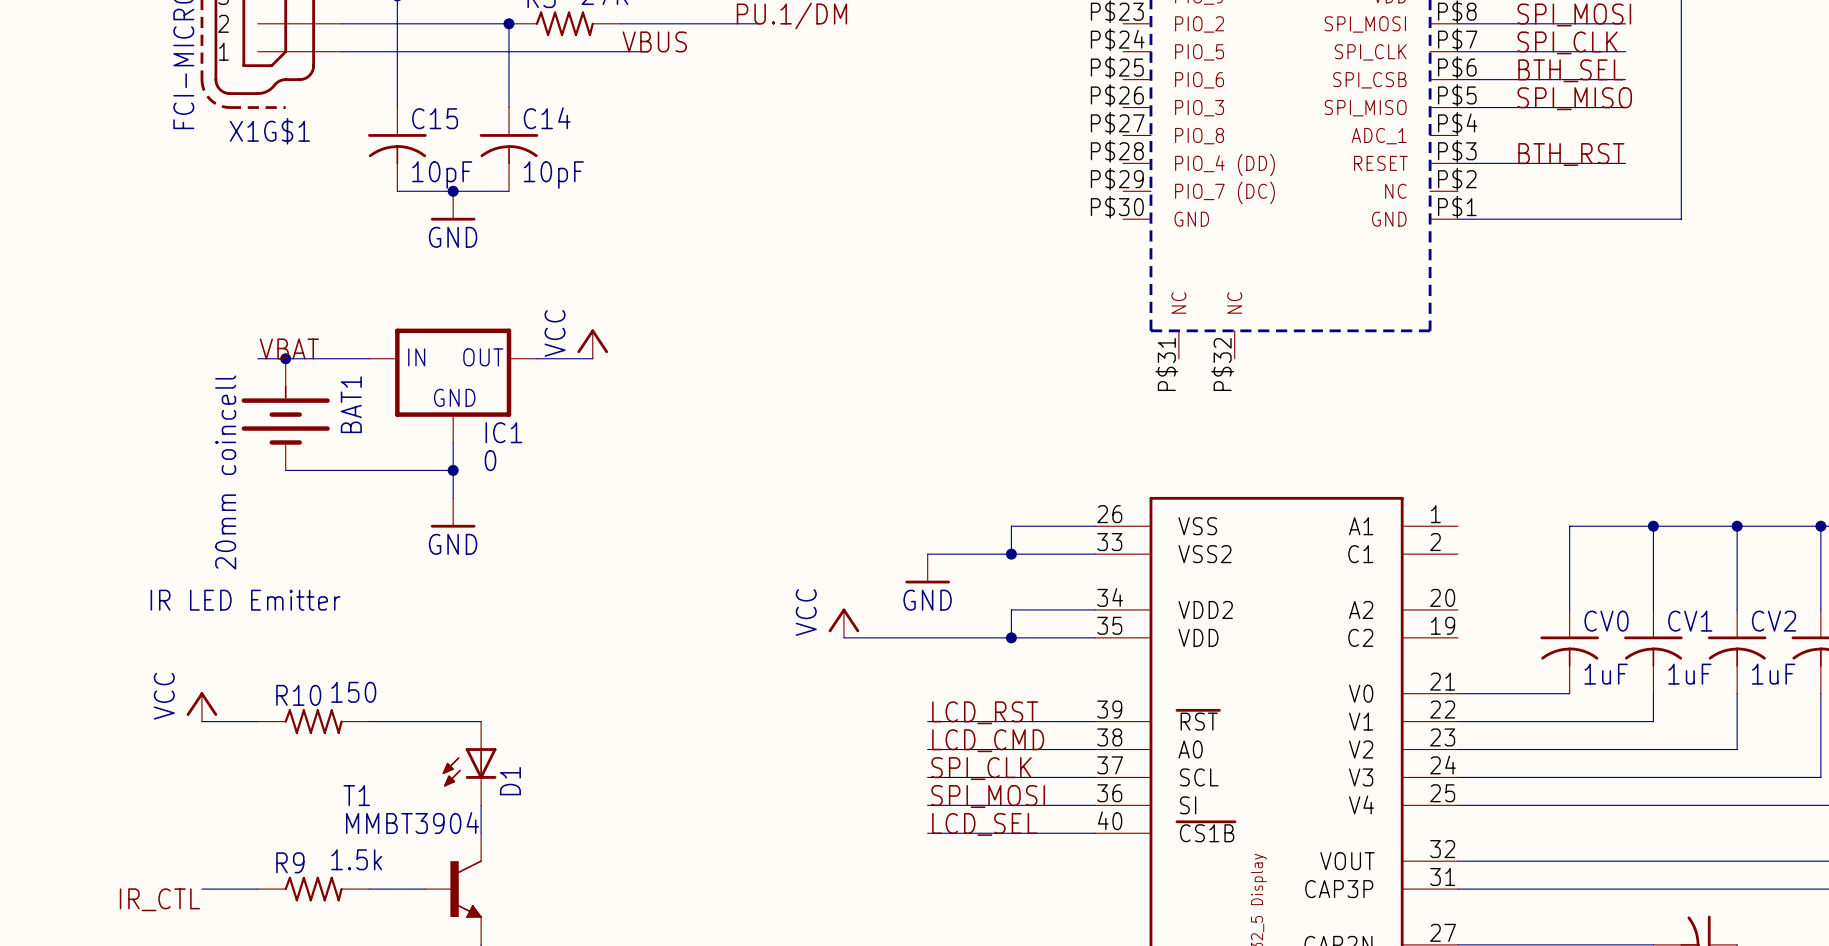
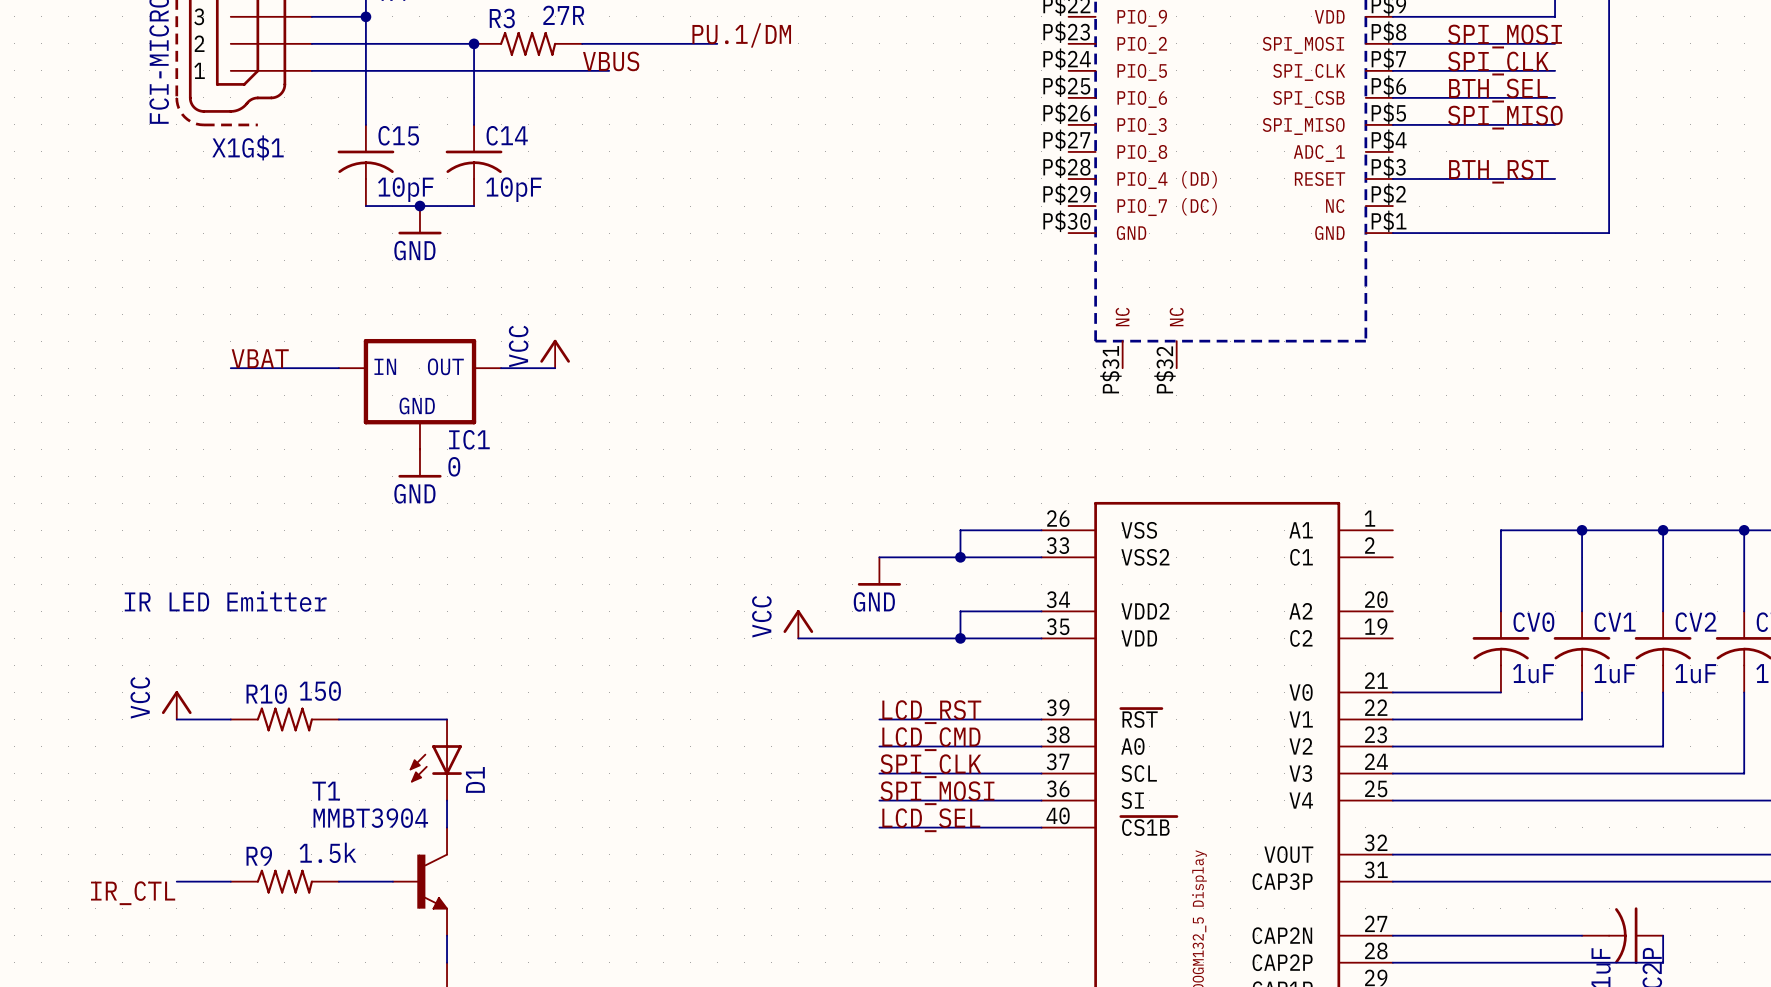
junction: (285, 358) -> none
BAT1: 20mm coincell (285, 414) -> none
wire: (285, 470) (453, 470) -> none
junction: (453, 470) -> none
power symbol position: GND (453, 512) -> GND (419, 463)

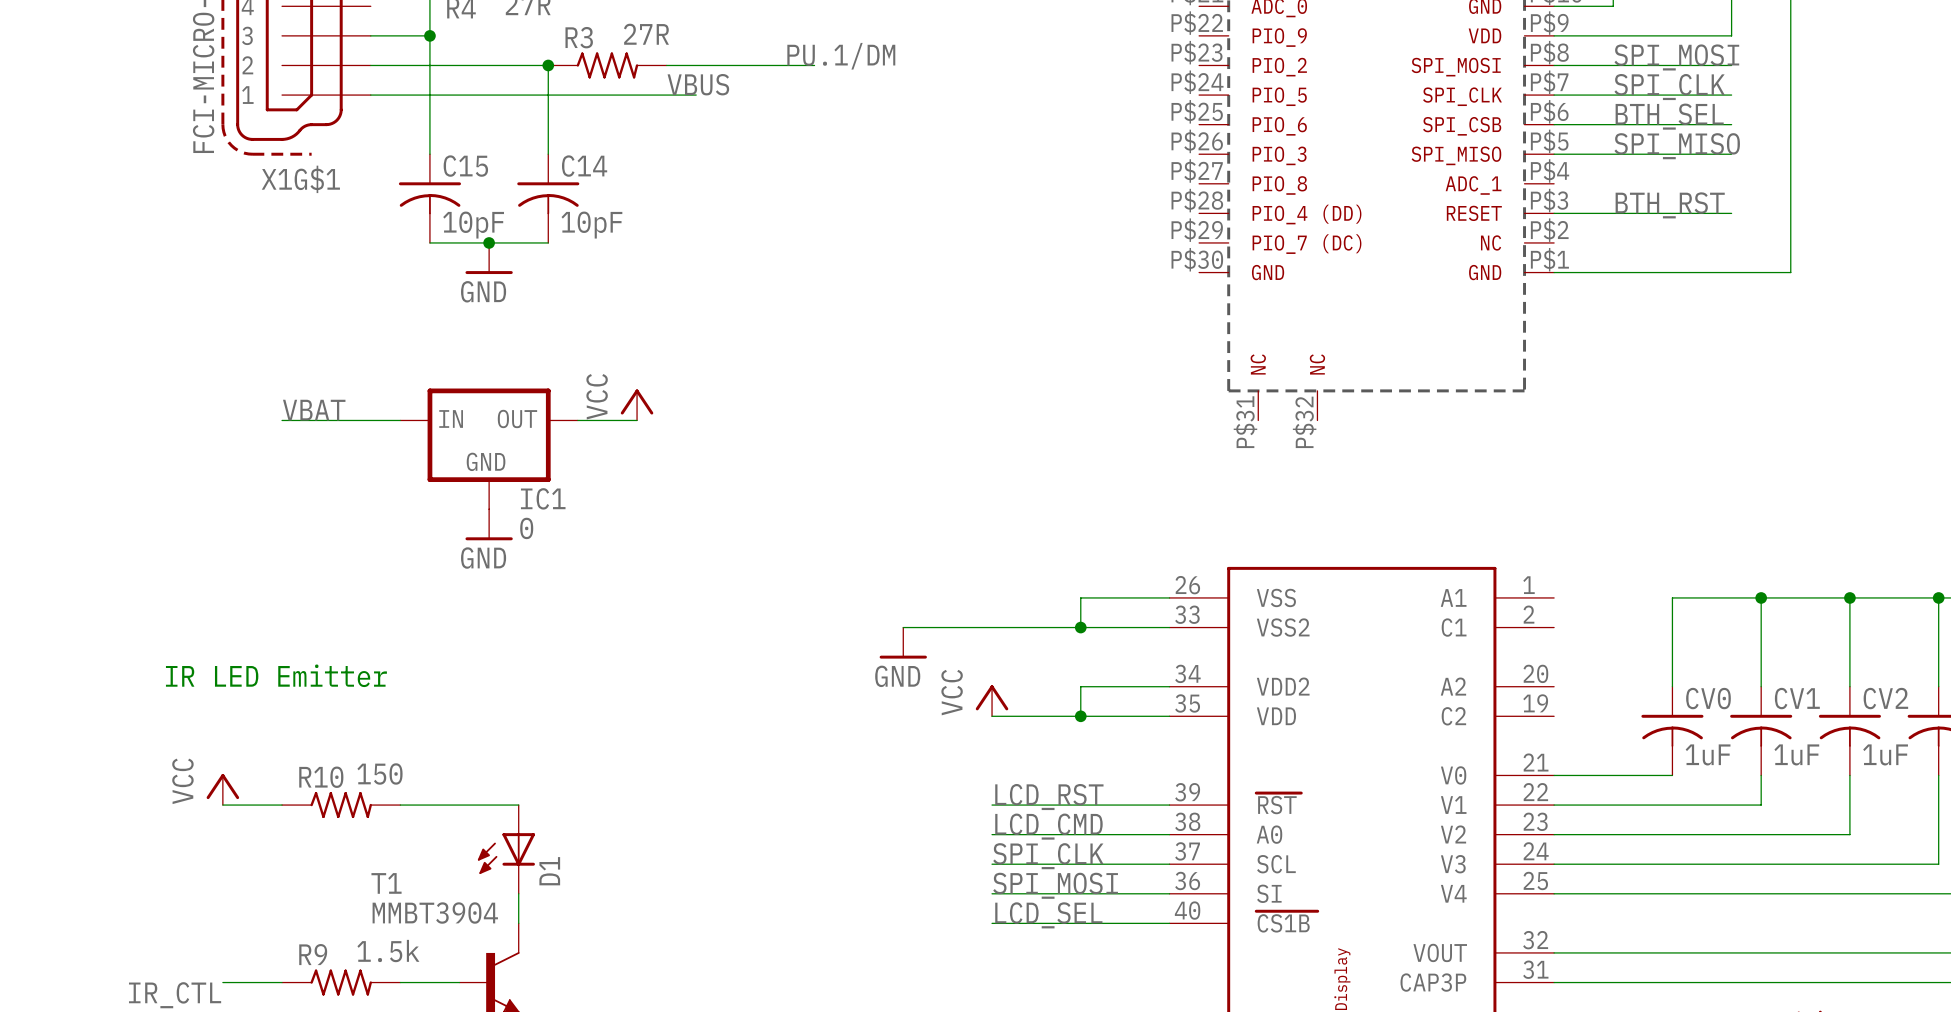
power symbol position: GND (879, 571) -> GND (903, 643)
power symbol position: VCC (798, 624) -> VCC (992, 700)
wire: (798, 638) (879, 638) -> (903, 627) (992, 627)

